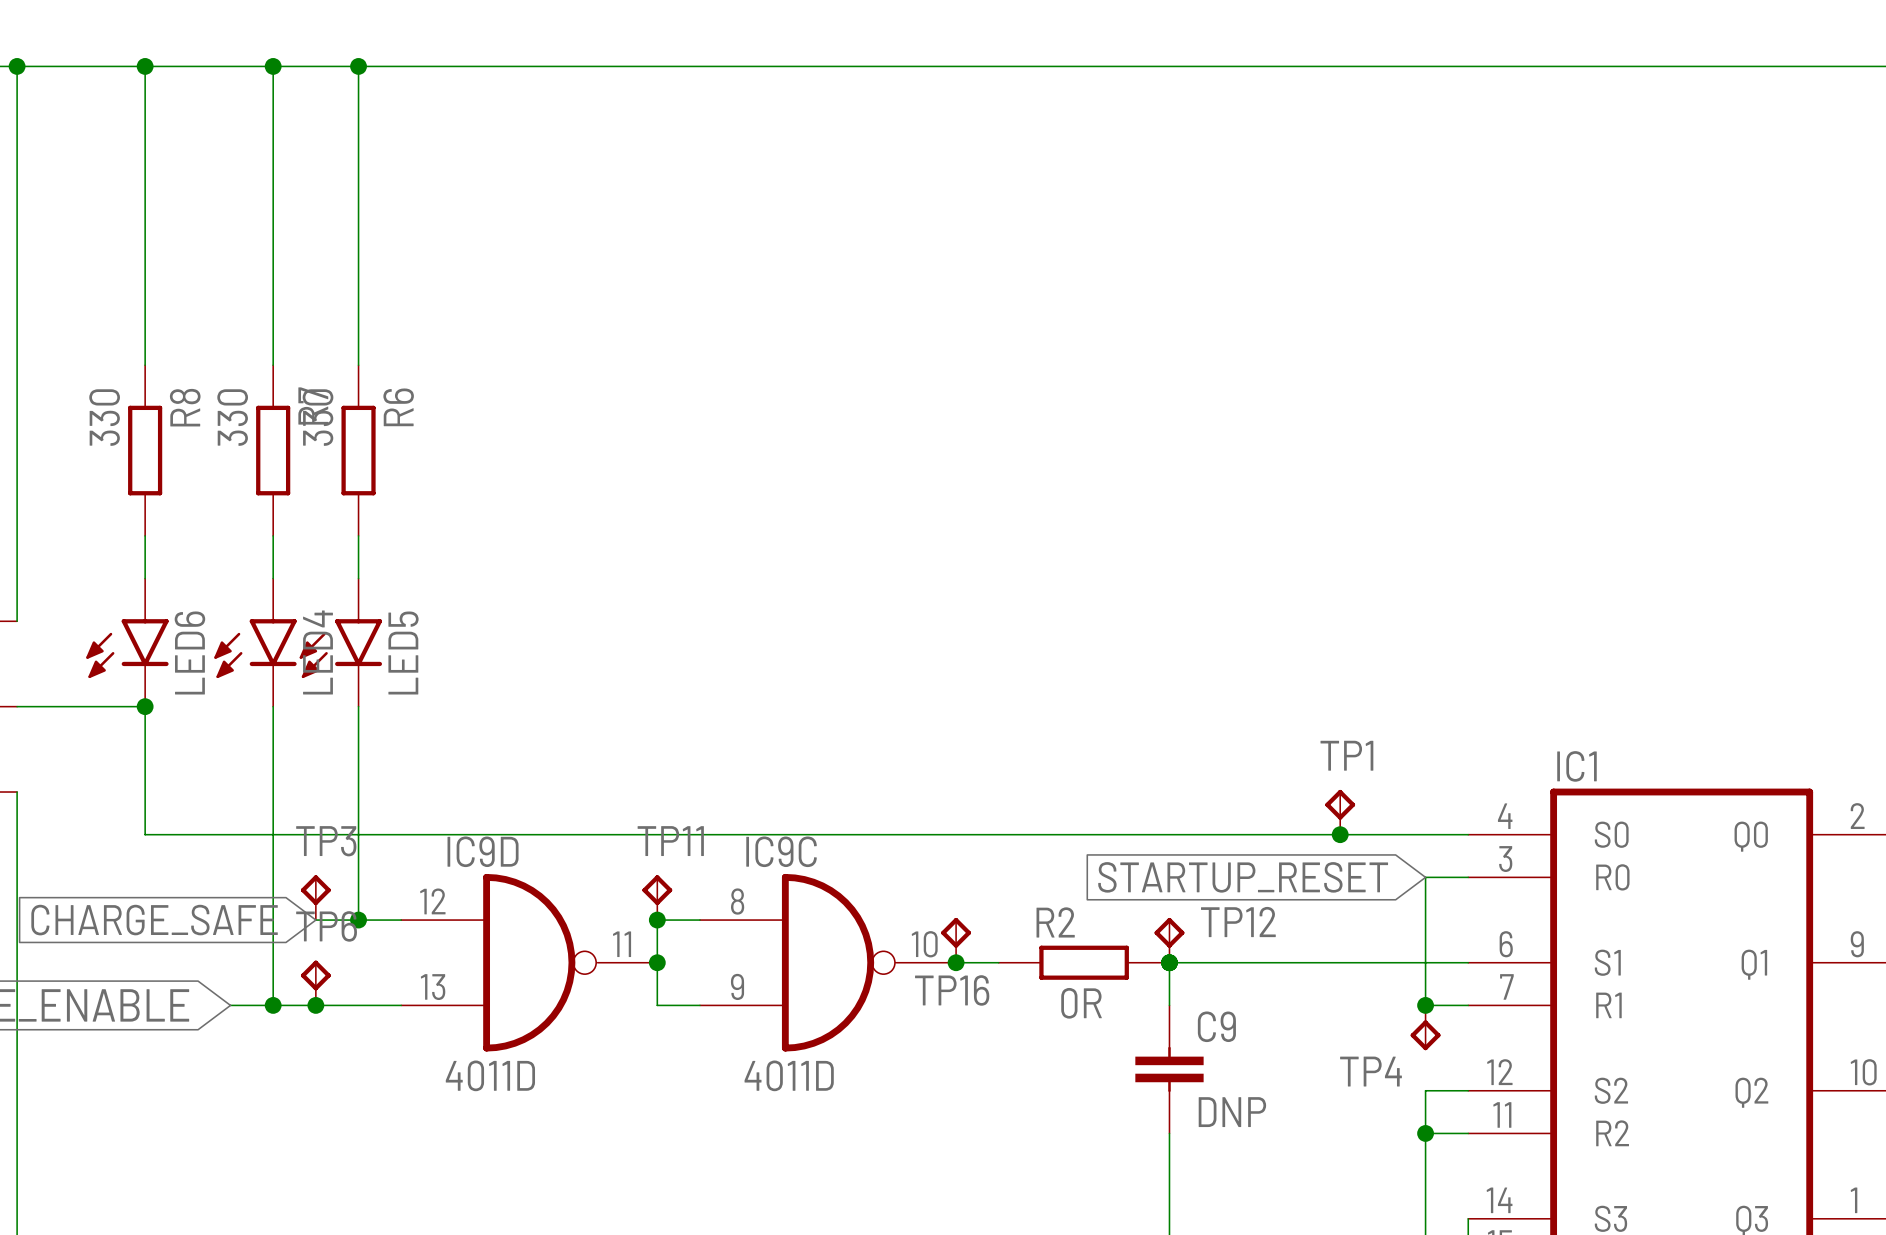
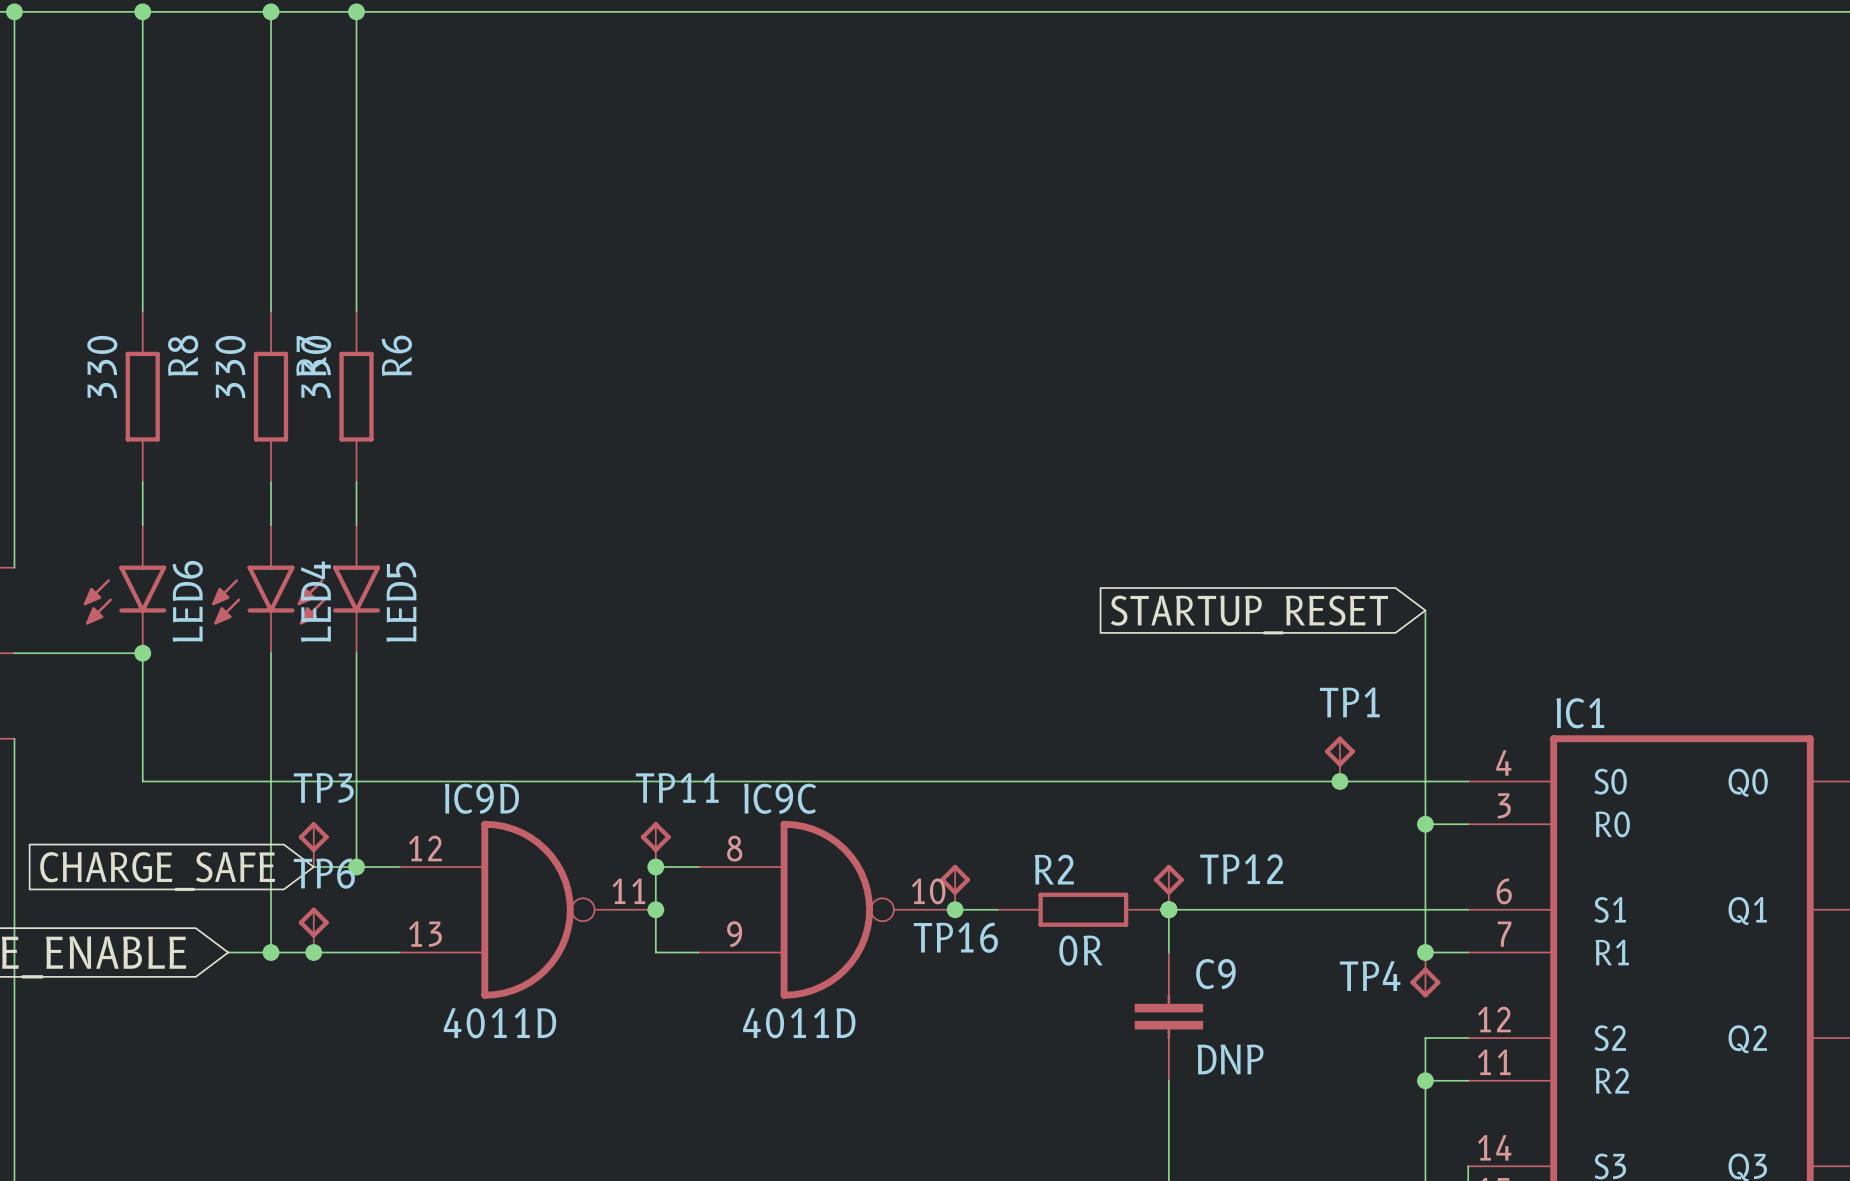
wire: none -> (1425, 610) (1425, 824)
global label position: STARTUP_RESET (1243, 877) -> STARTUP_RESET (1249, 614)
junction: none -> (1425, 824)
TP4 name position: TP4 (1371, 1071) -> TP4 (1370, 976)

